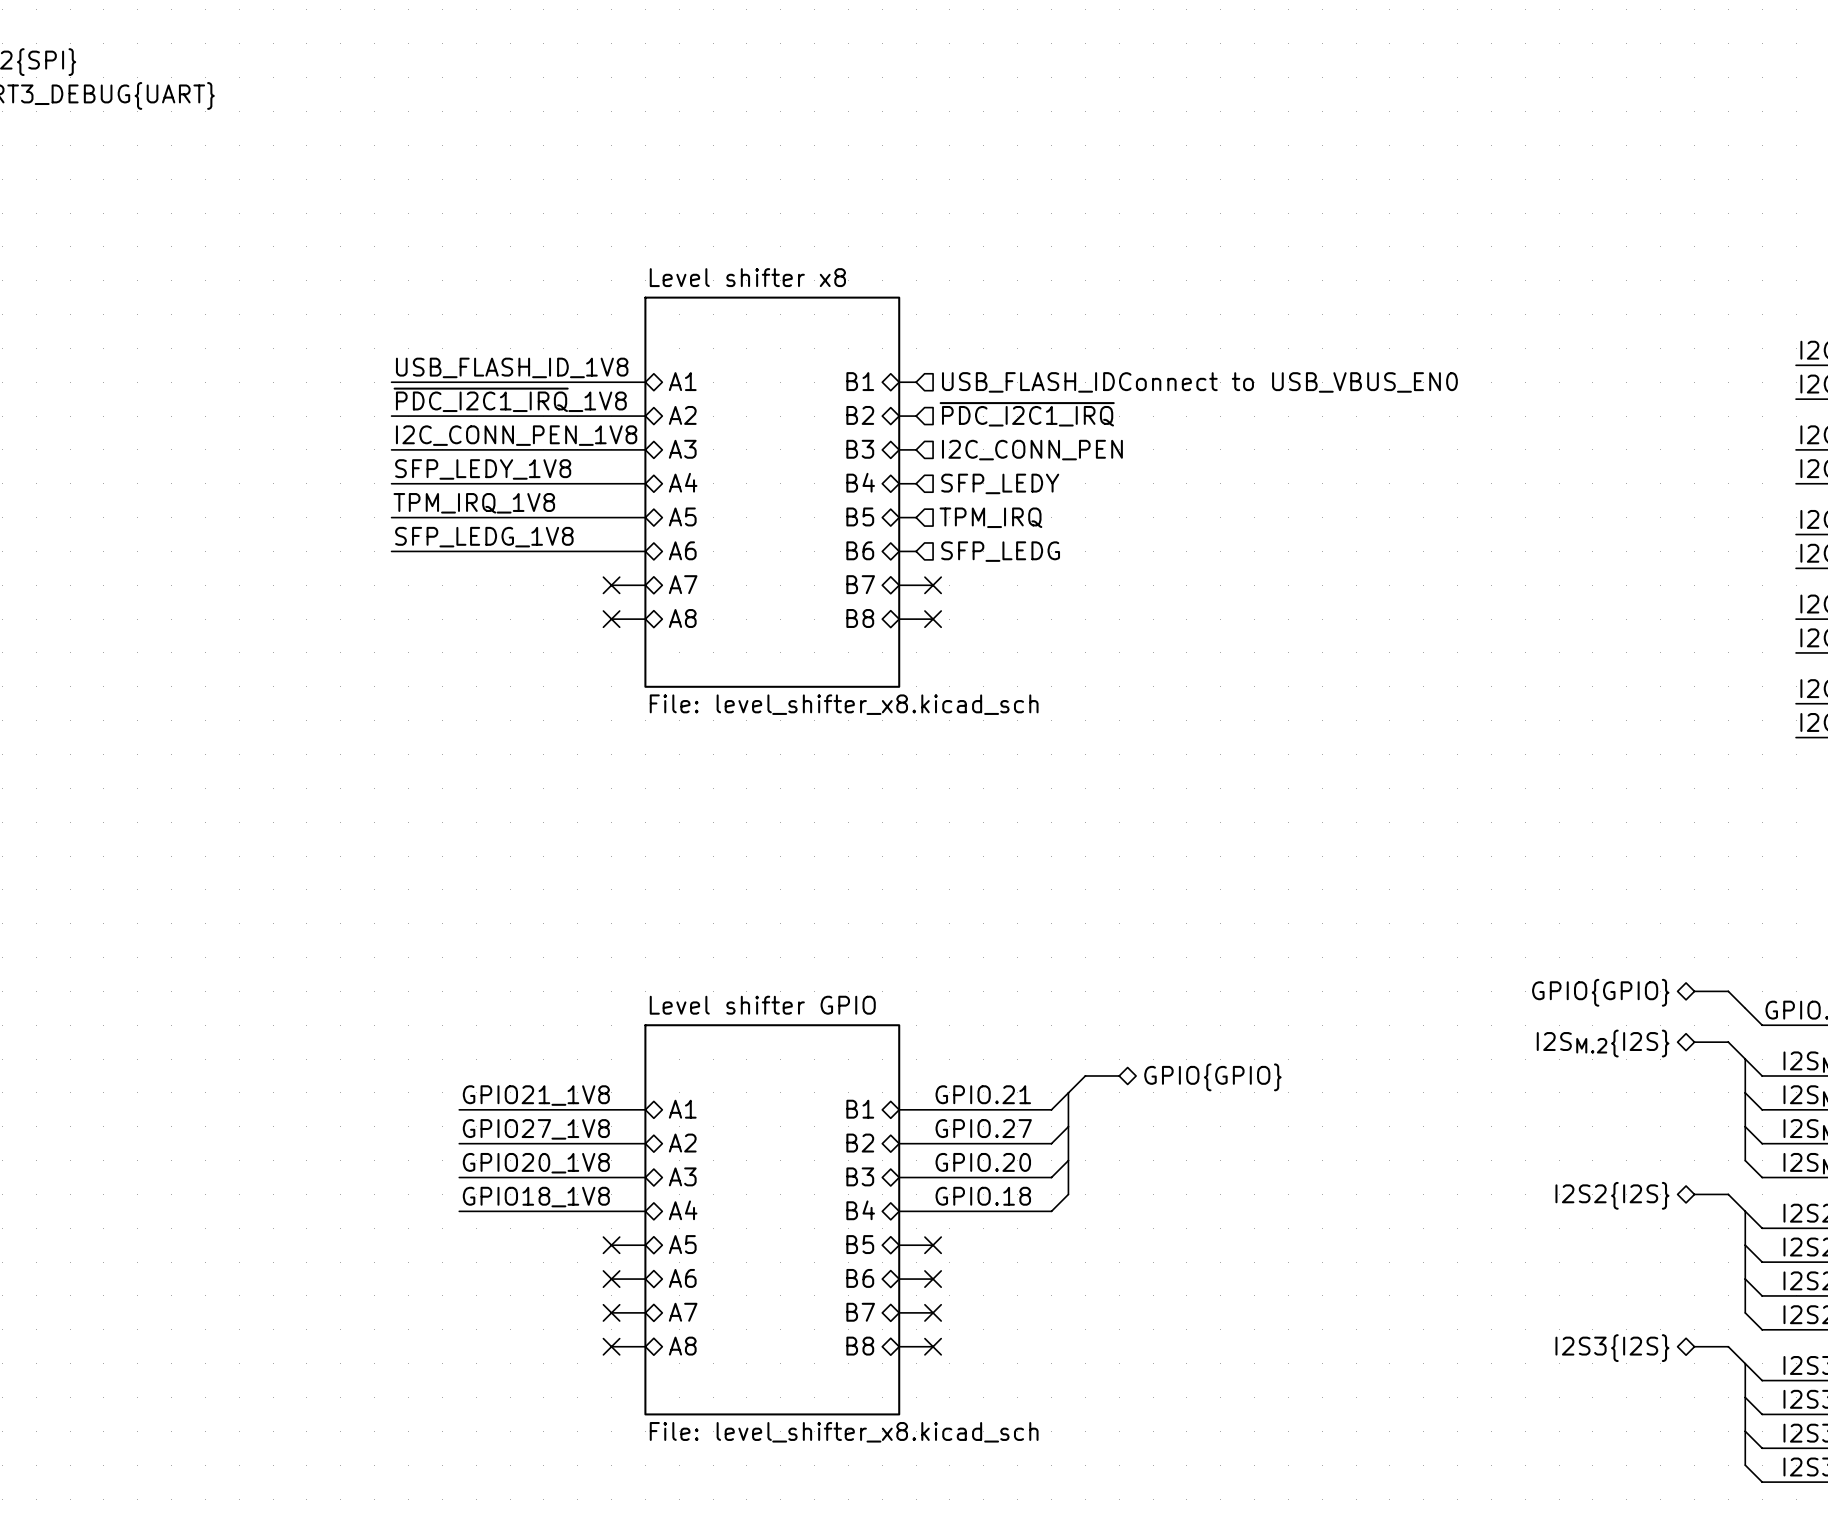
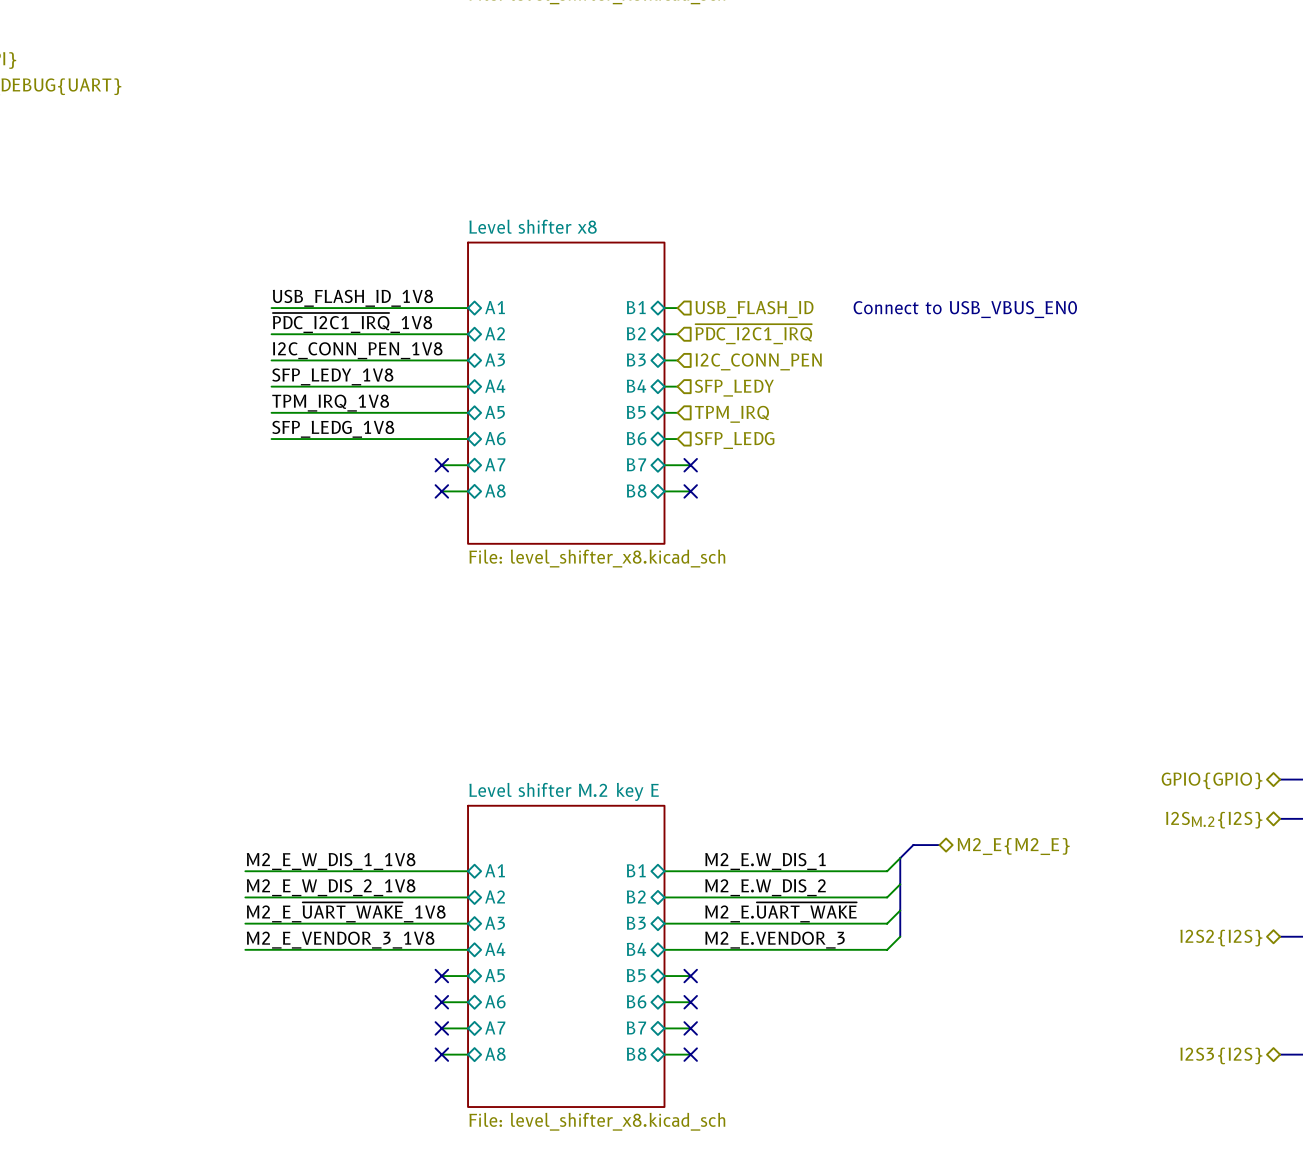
sheet Level shifter GPIO name: Level shifter GPIO (762, 1005) -> Level shifter M.2 key E (564, 791)
bus: (1119, 1075) (1085, 1075) (1068, 1092) (1068, 1194) -> (939, 845) (913, 845) (900, 858) (900, 936)
hierarchical label: GPIO{GPIO} (1212, 1077) -> none
hierarchical label: none -> M2_E{M2_E} (1013, 846)
wire: (1068, 1092) (1051, 1109) -> (900, 858) (887, 871) (782, 871)
label: GPIO.21 (983, 1094) -> none
label: none -> M2_E_W_DIS_1_1V8 (331, 861)
label: GPIO21_1V8 (536, 1095) -> none
label: none -> M2_E.W_DIS_1 (765, 861)
wire: none -> (245, 871) (323, 871)
wire: (1068, 1126) (1051, 1143) -> (900, 884) (887, 897) (782, 897)
label: GPIO.27 (983, 1128) -> none
label: none -> M2_E_W_DIS_2_1V8 (331, 887)
label: GPIO27_1V8 (536, 1129) -> none
label: none -> M2_E.W_DIS_2 (765, 887)
wire: none -> (245, 897) (323, 897)
wire: (1068, 1160) (1051, 1177) -> (900, 910) (887, 923) (782, 923)
label: none -> M2_E_~{UART_WAKE}_1V8 (346, 912)
label: none -> M2_E.~{UART_WAKE} (780, 912)
label: GPIO.20 (983, 1162) -> none
label: GPIO20_1V8 (536, 1163) -> none
wire: none -> (245, 923) (323, 923)
wire: (1068, 1194) (1051, 1211) -> (900, 936) (887, 949) (782, 949)
label: GPIO.18 (983, 1196) -> none
label: none -> M2_E_VENDOR_3_1V8 (340, 940)
label: GPIO18_1V8 (536, 1197) -> none
label: none -> M2_E.VENDOR_3 (775, 940)
wire: none -> (245, 949) (323, 949)

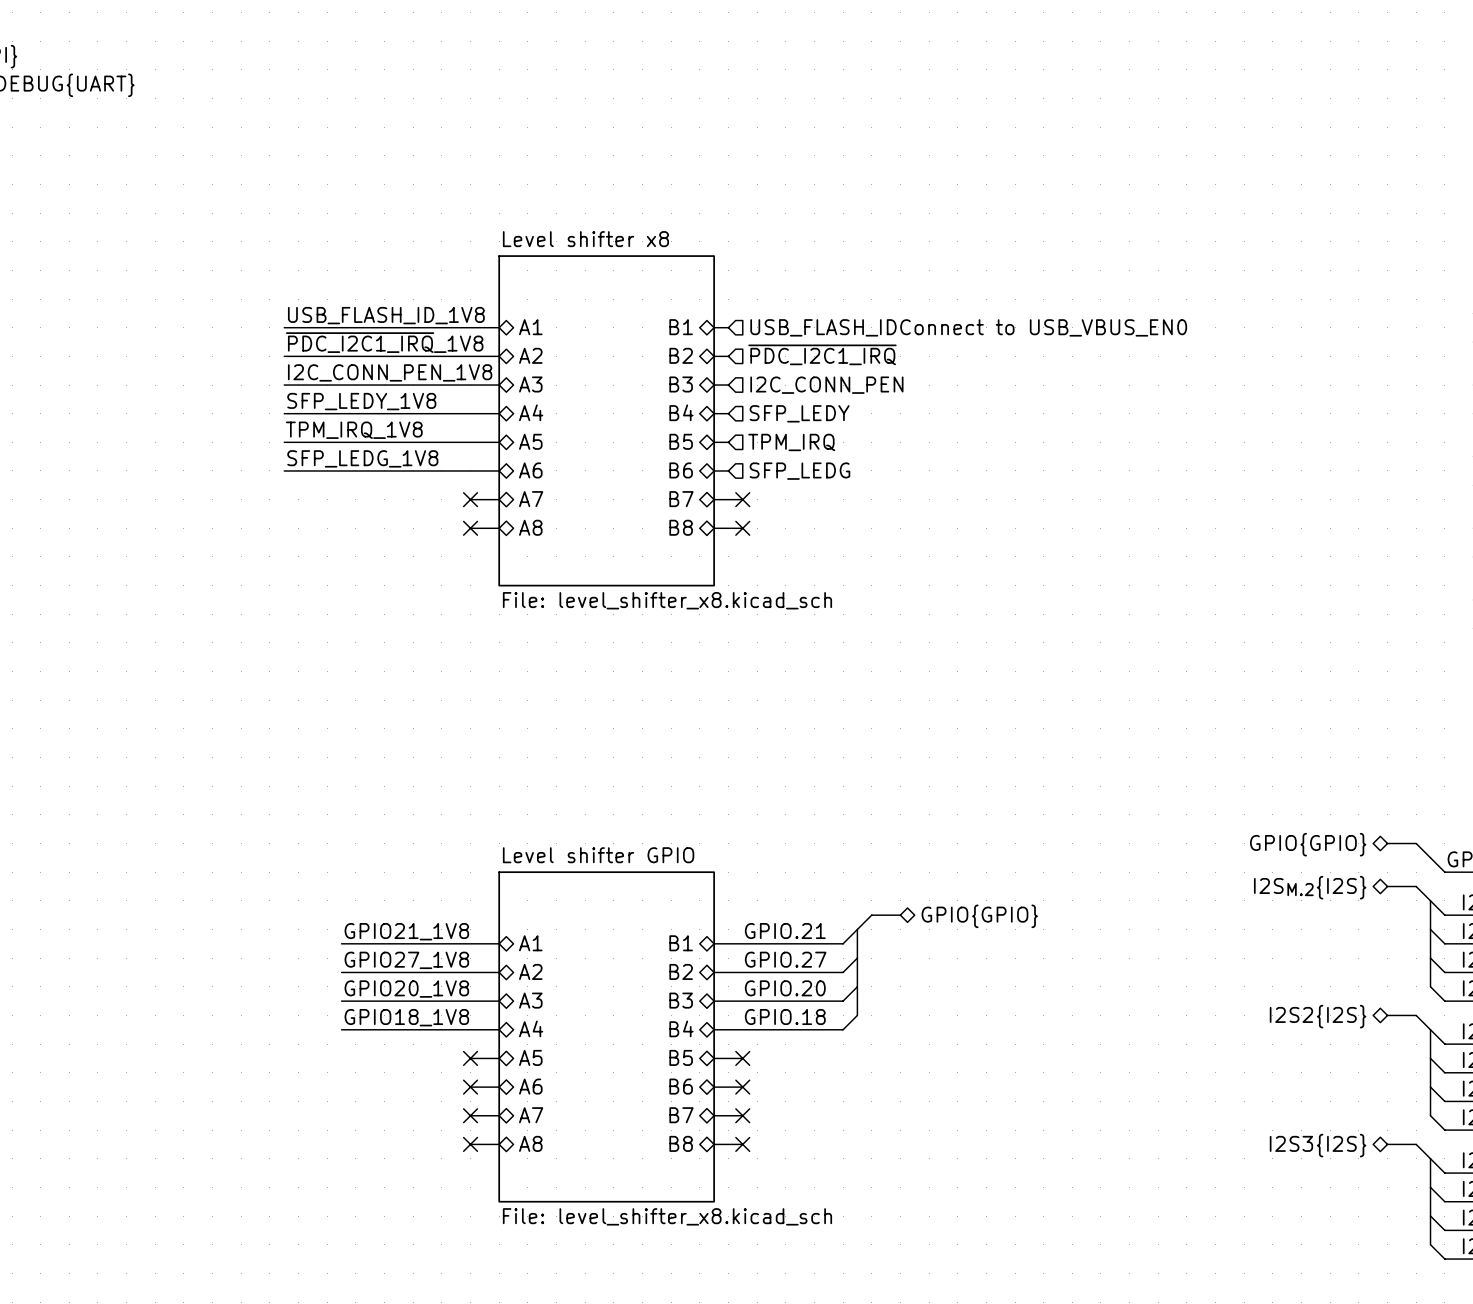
sheet Level shifter M.2 key E name: Level shifter M.2 key E (564, 791) -> Level shifter GPIO (598, 855)
bus: (939, 845) (913, 845) (900, 858) (900, 936) -> (900, 915) (871, 915) (857, 929) (857, 1015)
hierarchical label: none -> GPIO{GPIO} (979, 916)
hierarchical label: M2_E{M2_E} (1013, 846) -> none
wire: (900, 858) (887, 871) (782, 871) -> (857, 929) (843, 943)
label: none -> GPIO.21 (785, 931)
label: M2_E_W_DIS_1_1V8 (331, 861) -> none
label: none -> GPIO21_1V8 (406, 931)
label: M2_E.W_DIS_1 (765, 861) -> none
wire: (245, 871) (323, 871) -> none
wire: (900, 884) (887, 897) (782, 897) -> (857, 958) (843, 972)
label: none -> GPIO.27 (785, 959)
label: M2_E_W_DIS_2_1V8 (331, 887) -> none
label: none -> GPIO27_1V8 (406, 960)
label: M2_E.W_DIS_2 (765, 887) -> none
wire: (245, 897) (323, 897) -> none
wire: (900, 910) (887, 923) (782, 923) -> (857, 986) (843, 1001)
label: M2_E_~{UART_WAKE}_1V8 (346, 912) -> none
label: none -> GPIO.20 (785, 988)
label: M2_E.~{UART_WAKE} (780, 912) -> none
label: none -> GPIO20_1V8 (406, 989)
wire: (245, 923) (323, 923) -> none
wire: (900, 936) (887, 949) (782, 949) -> (857, 1015) (843, 1029)
label: none -> GPIO.18 (785, 1017)
label: M2_E_VENDOR_3_1V8 (340, 940) -> none
label: none -> GPIO18_1V8 (406, 1017)
label: M2_E.VENDOR_3 (775, 940) -> none
wire: (245, 949) (323, 949) -> none

